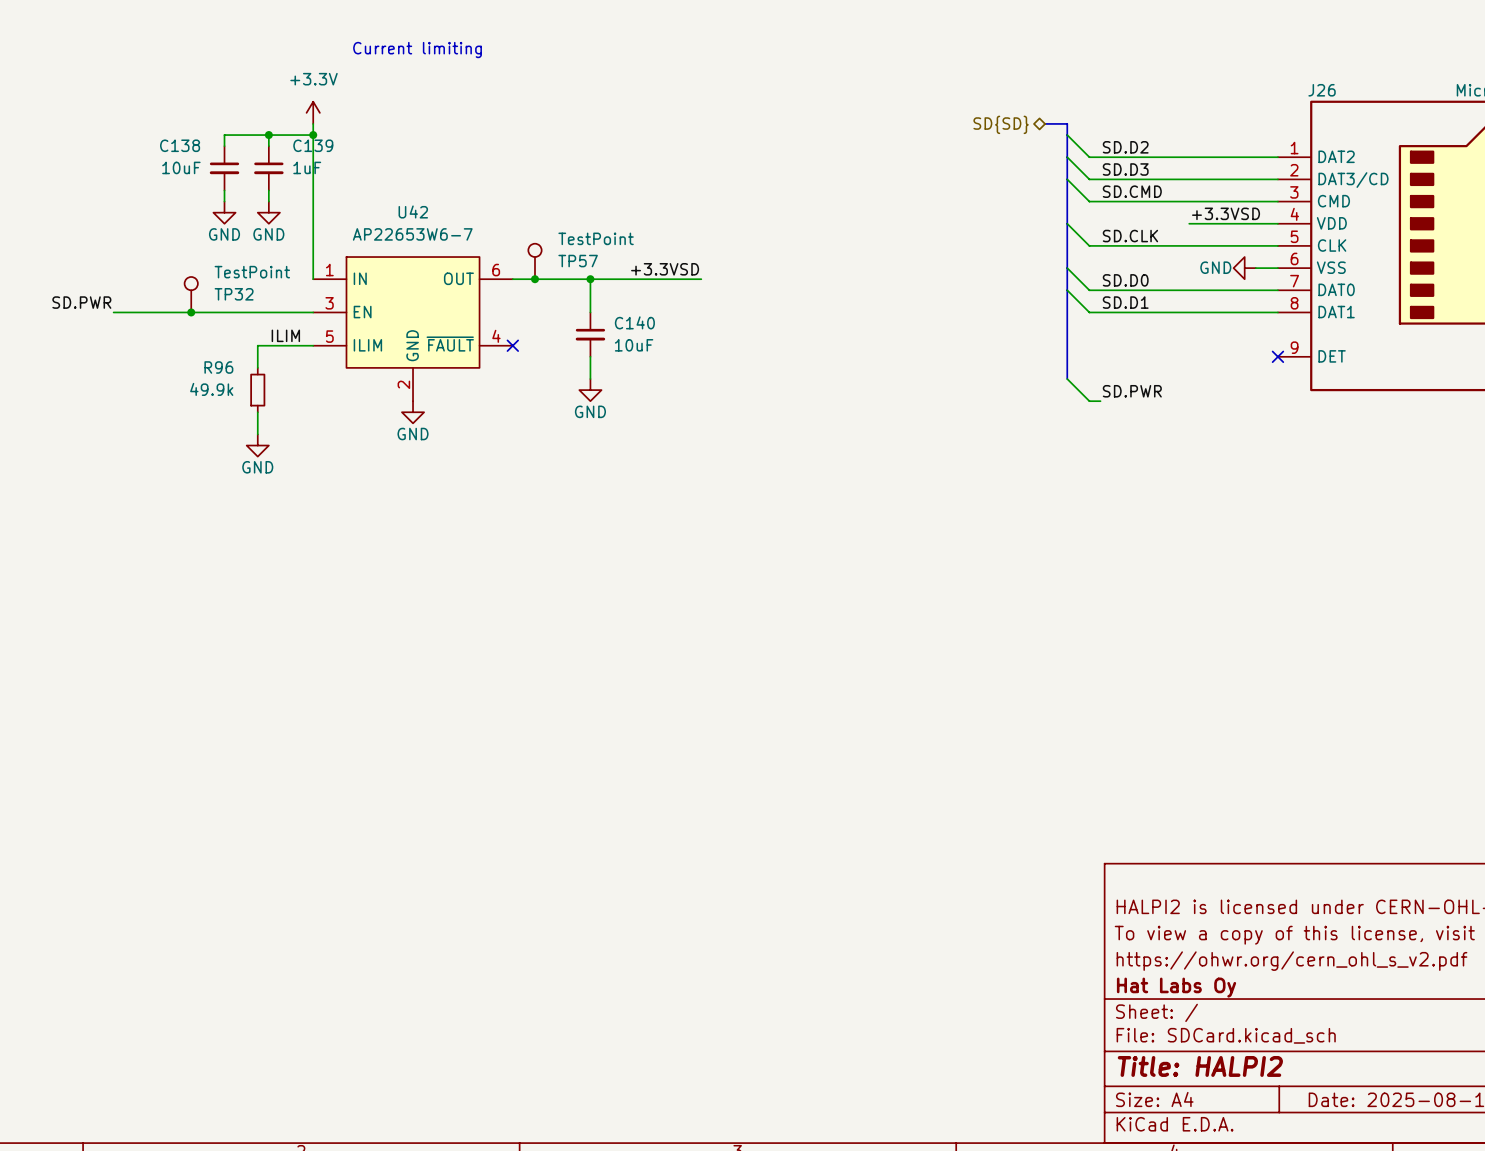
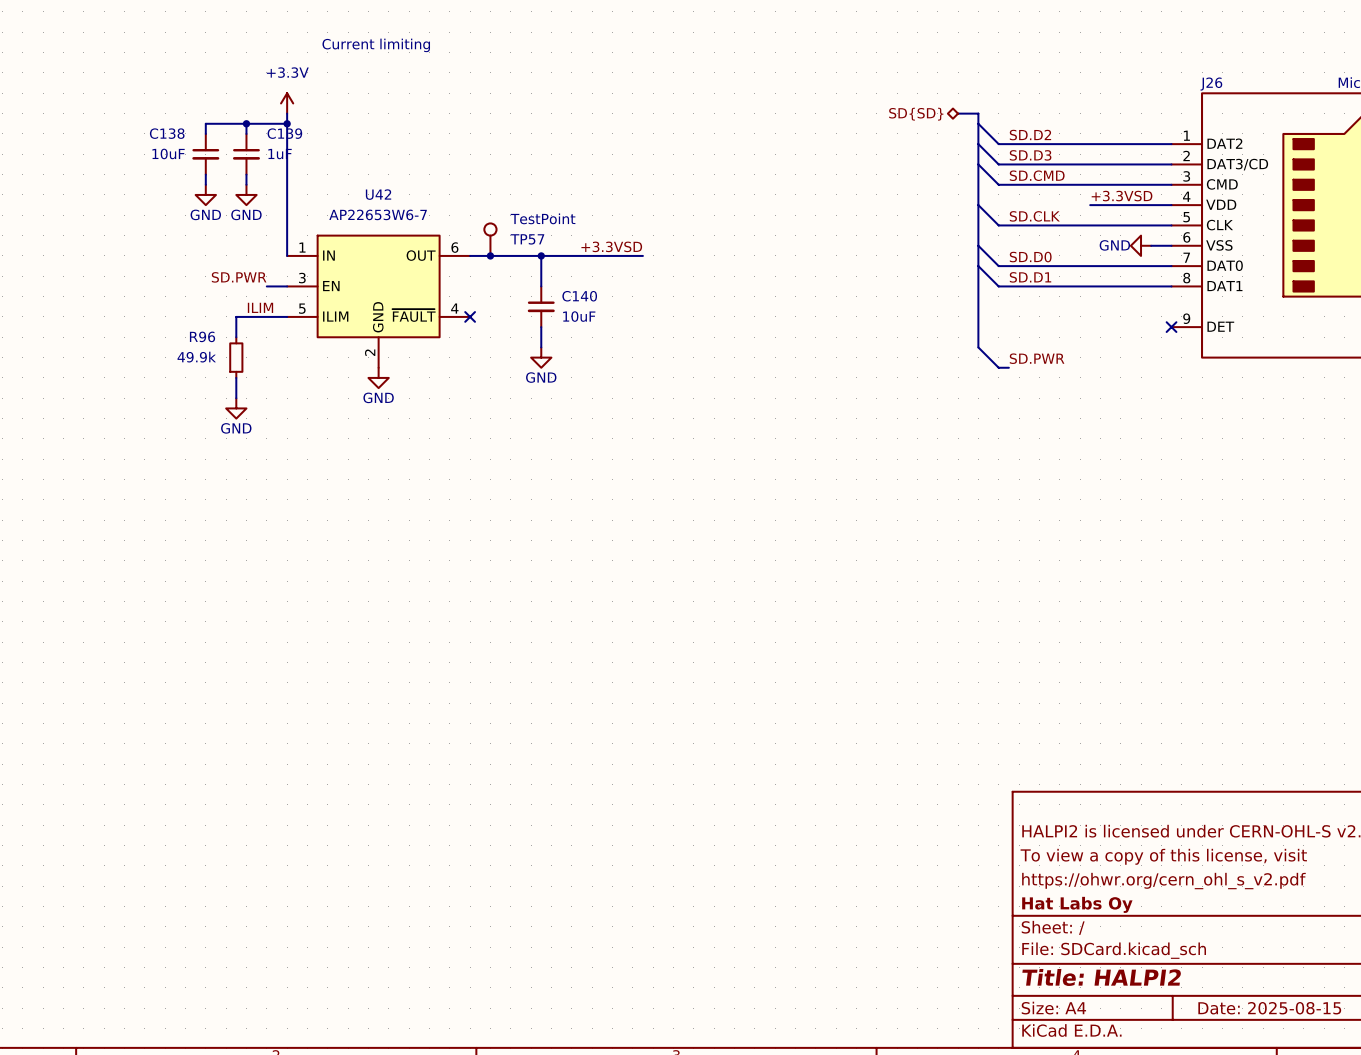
TP32: TestPoint (191, 294) -> none
label position: SD.PWR (81, 302) -> SD.PWR (239, 277)
wire: (113, 312) (291, 312) -> none
junction: (191, 312) -> none

